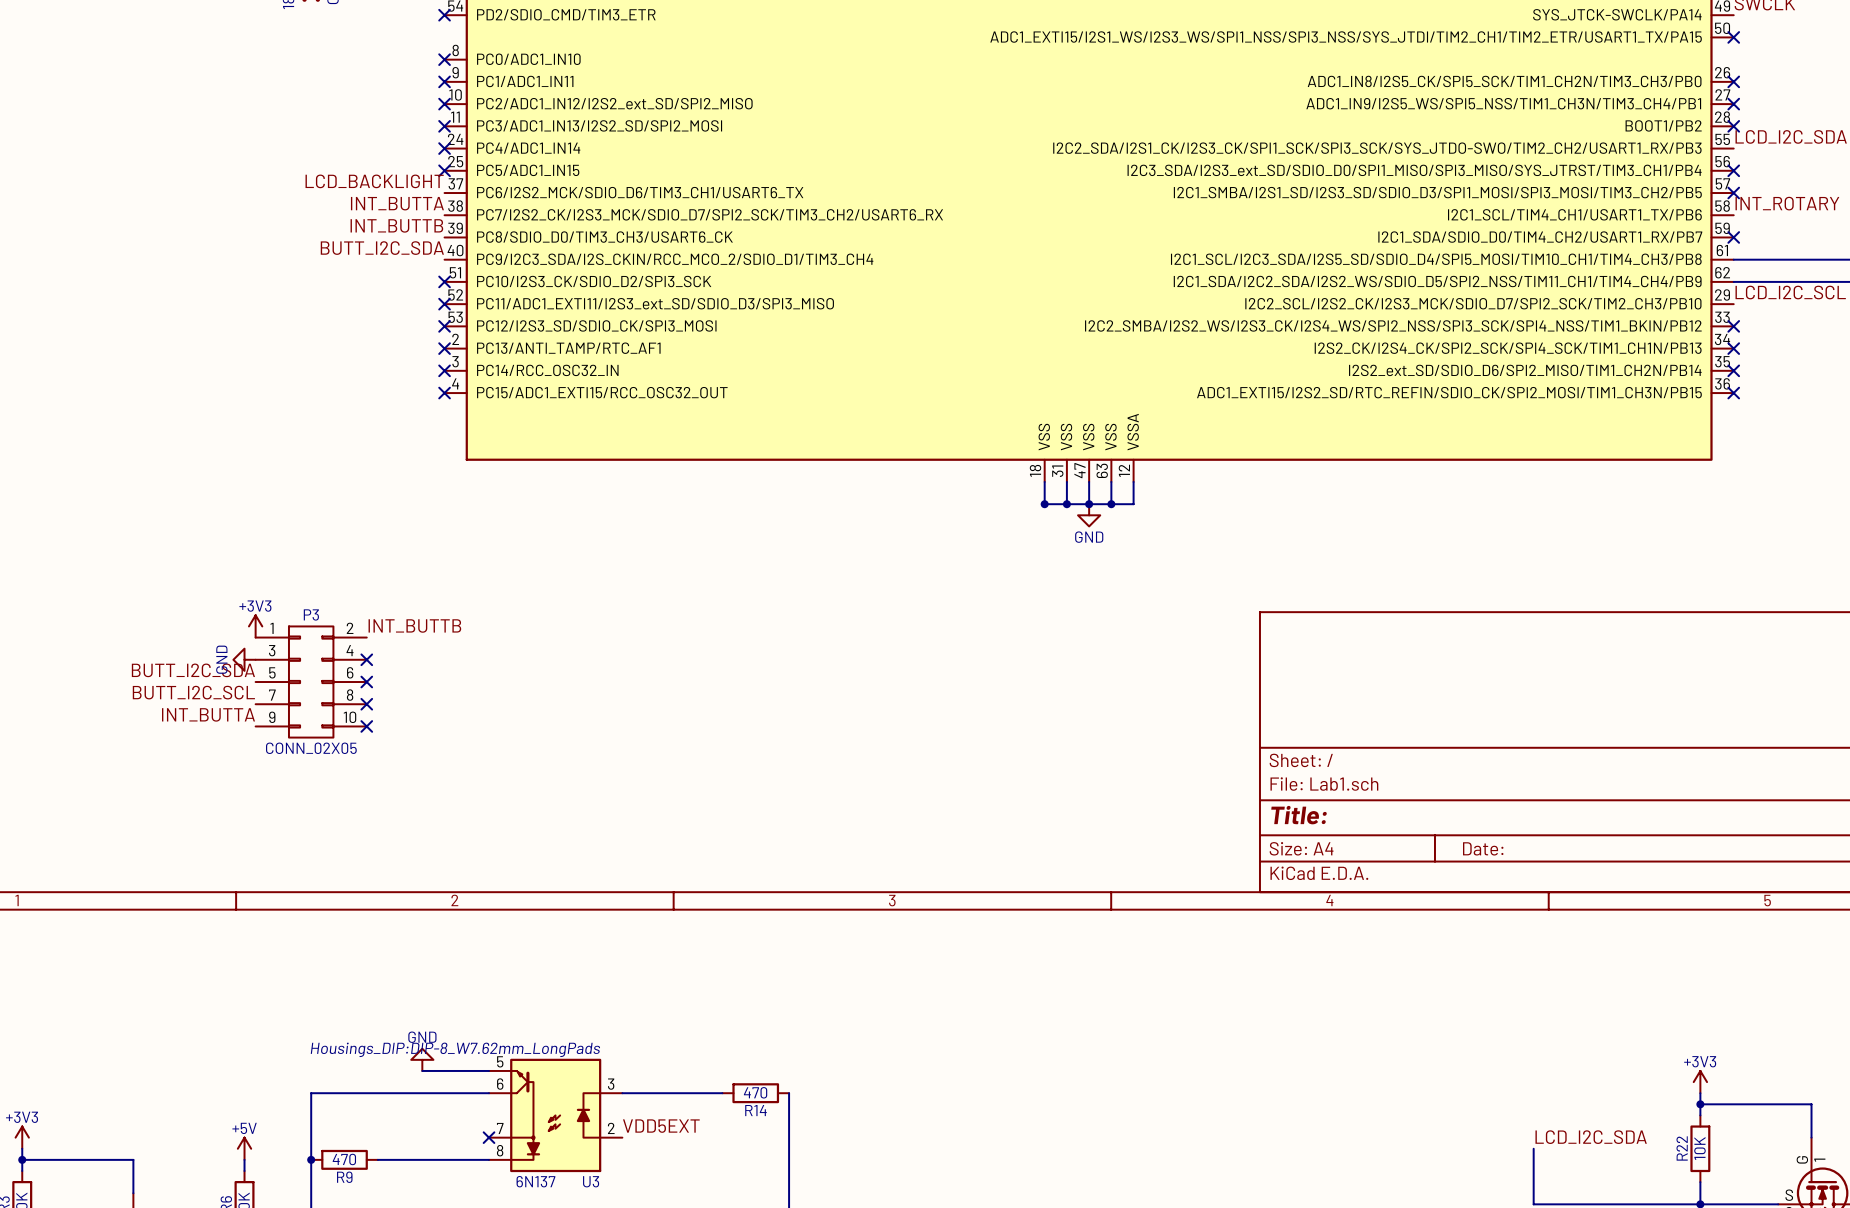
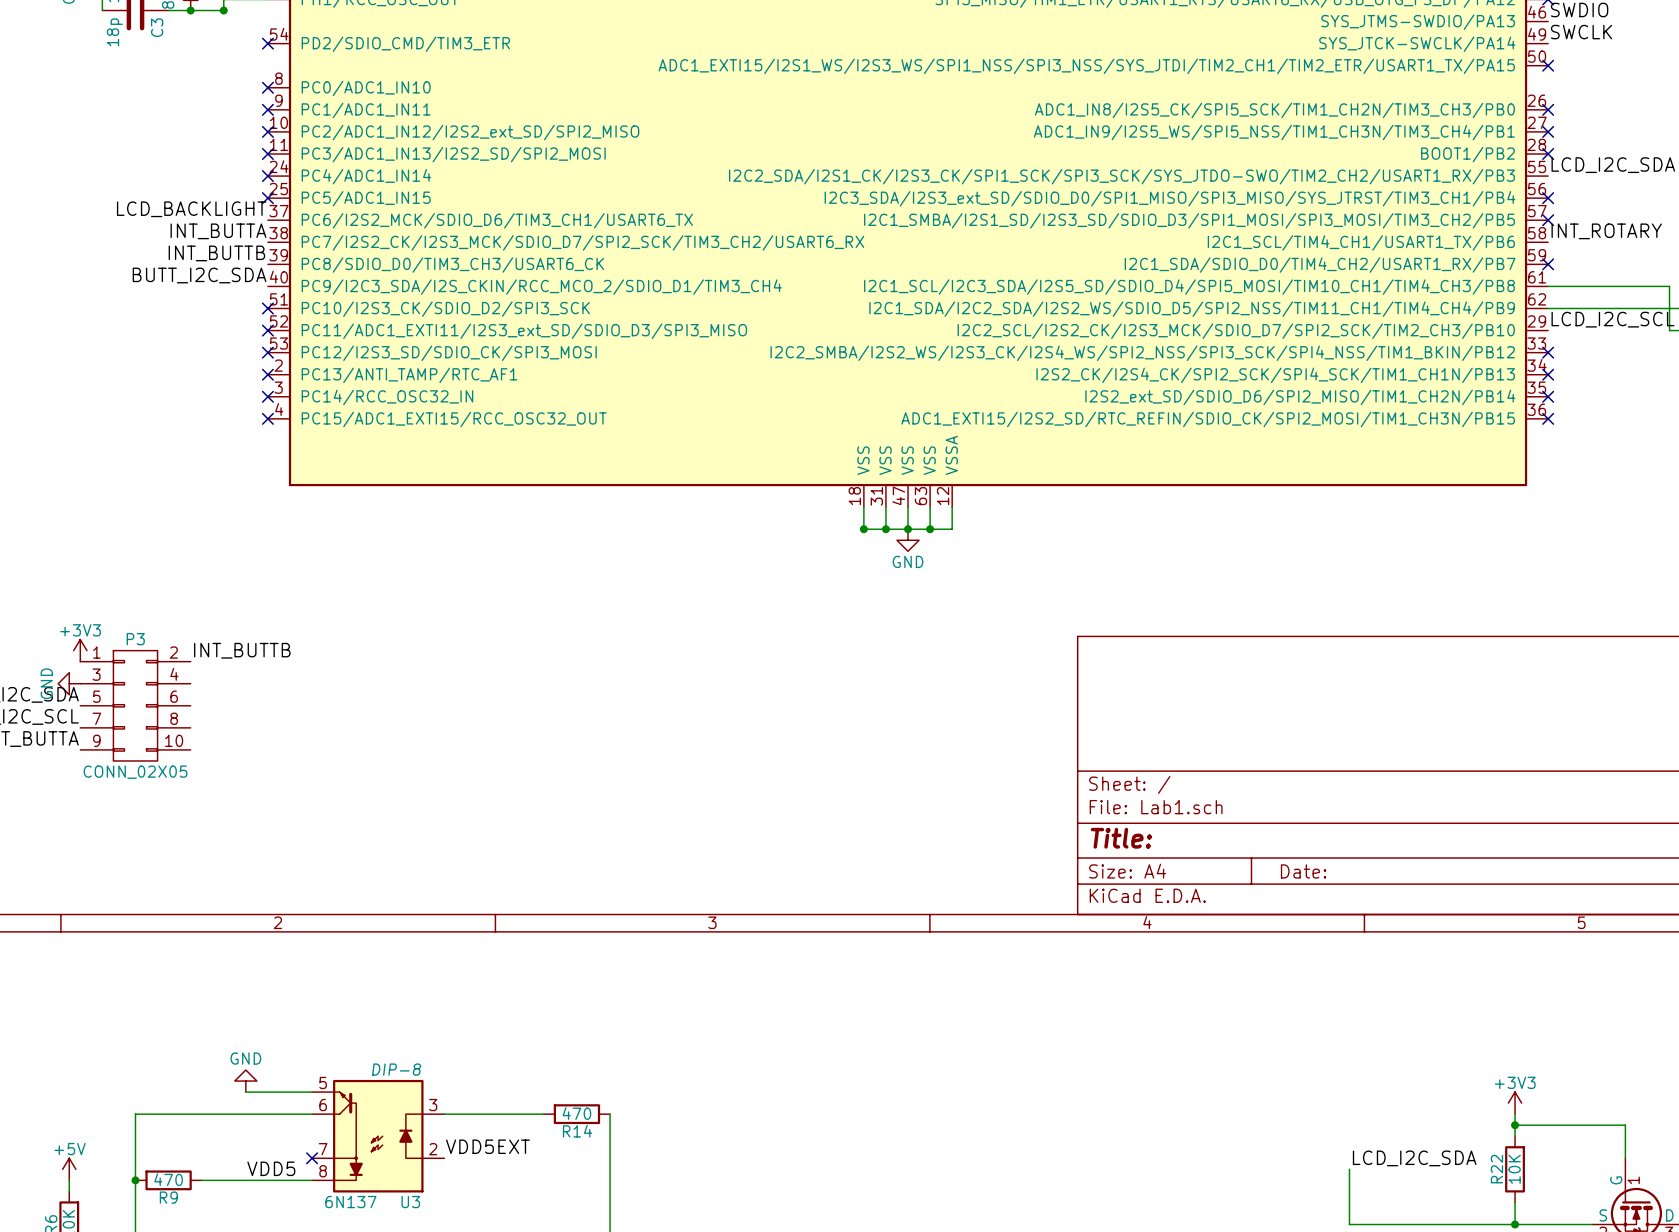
no-connect mark: (366, 659) -> none
no-connect mark: (366, 682) -> none
no-connect mark: (366, 704) -> none
no-connect mark: (366, 726) -> none
U3 text: Housings_DIP:DIP-8_W7.62mm_LongPads (455, 1049) -> DIP-8 (396, 1069)
label: none -> VDD5 (271, 1168)

